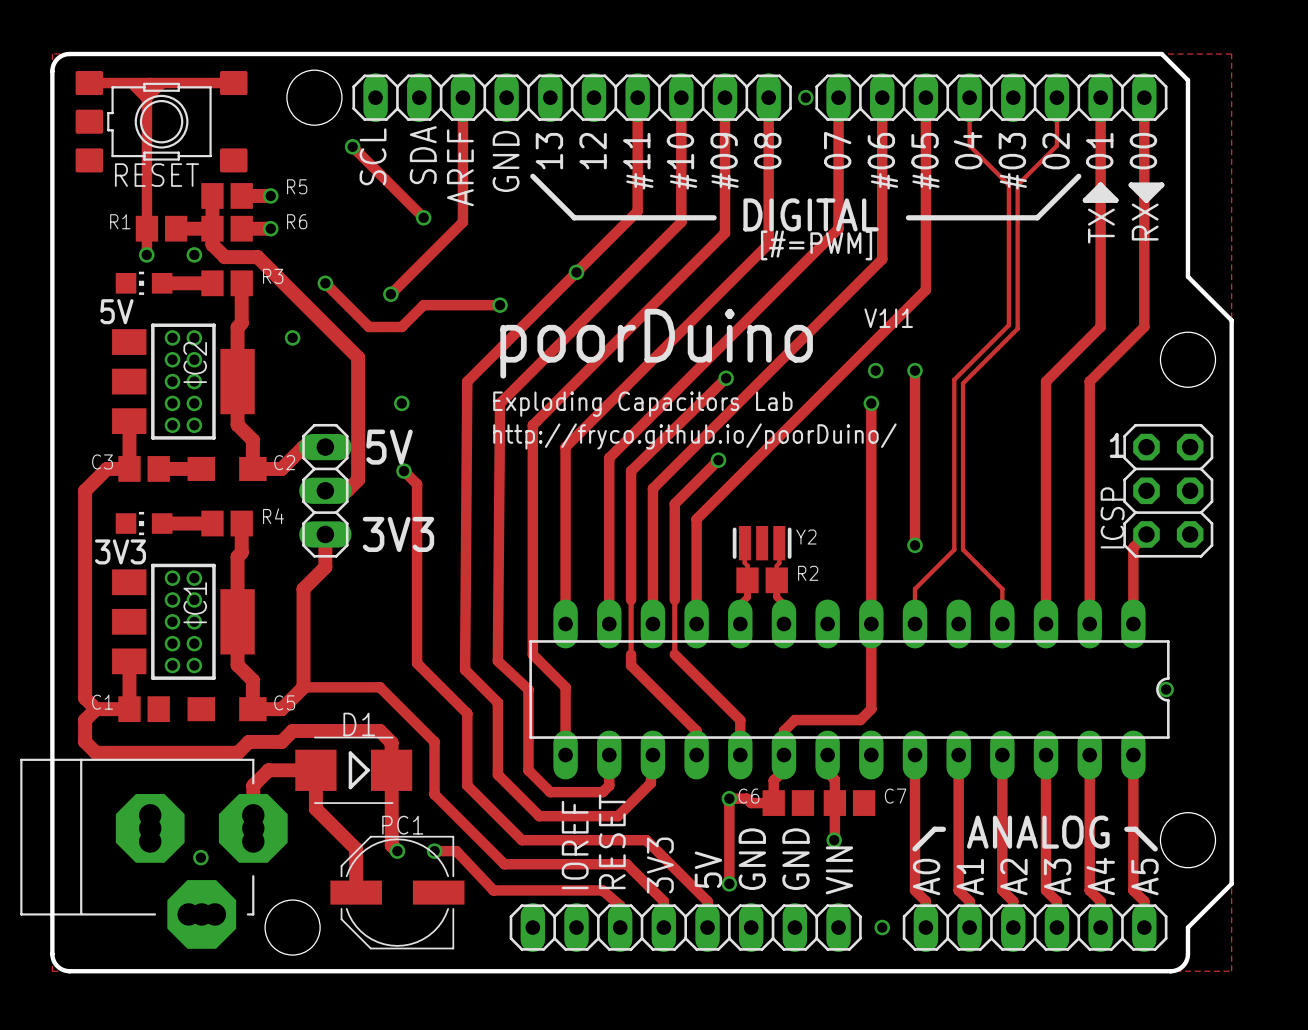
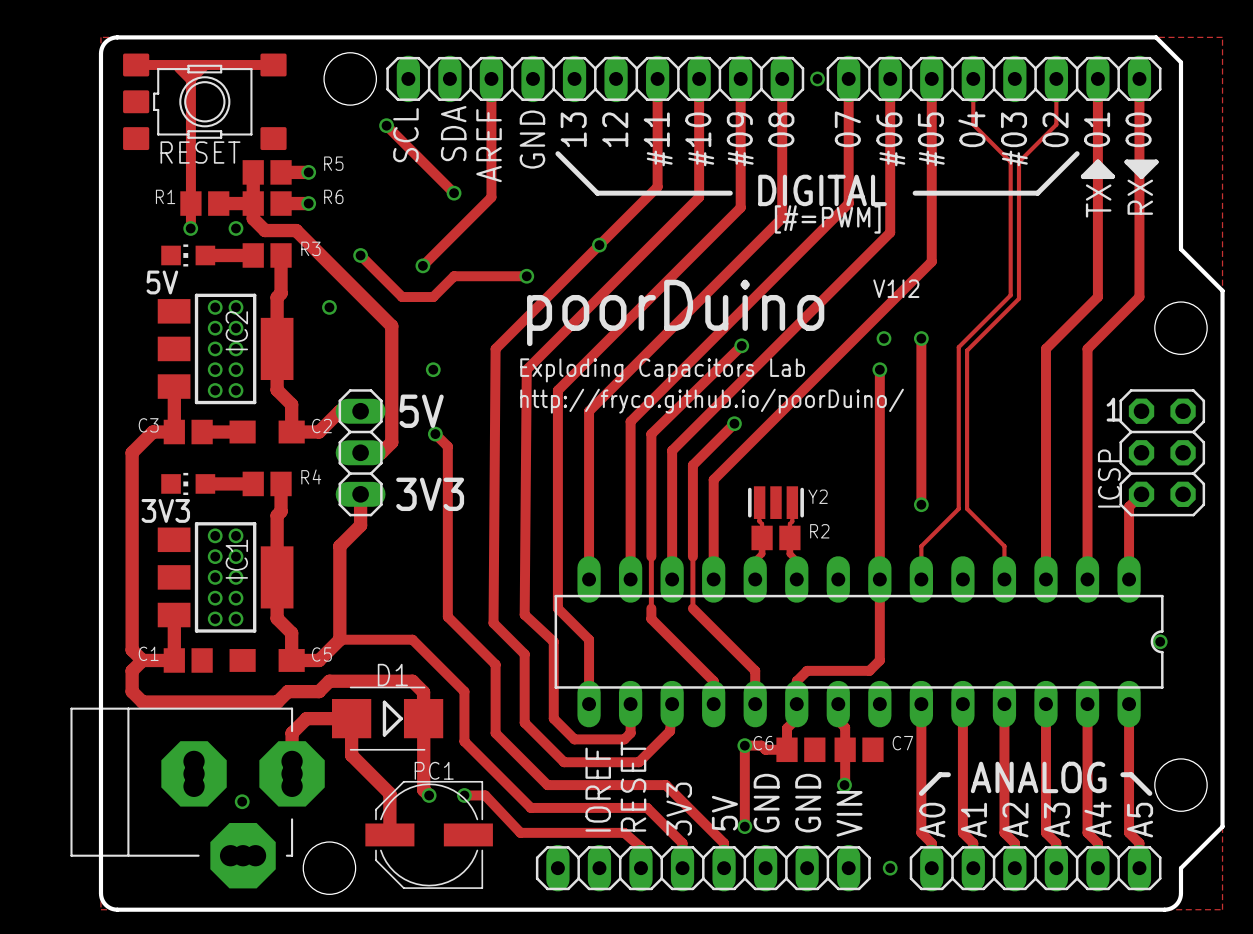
text: V1I1 (888, 318) -> V1I2 (896, 288)

